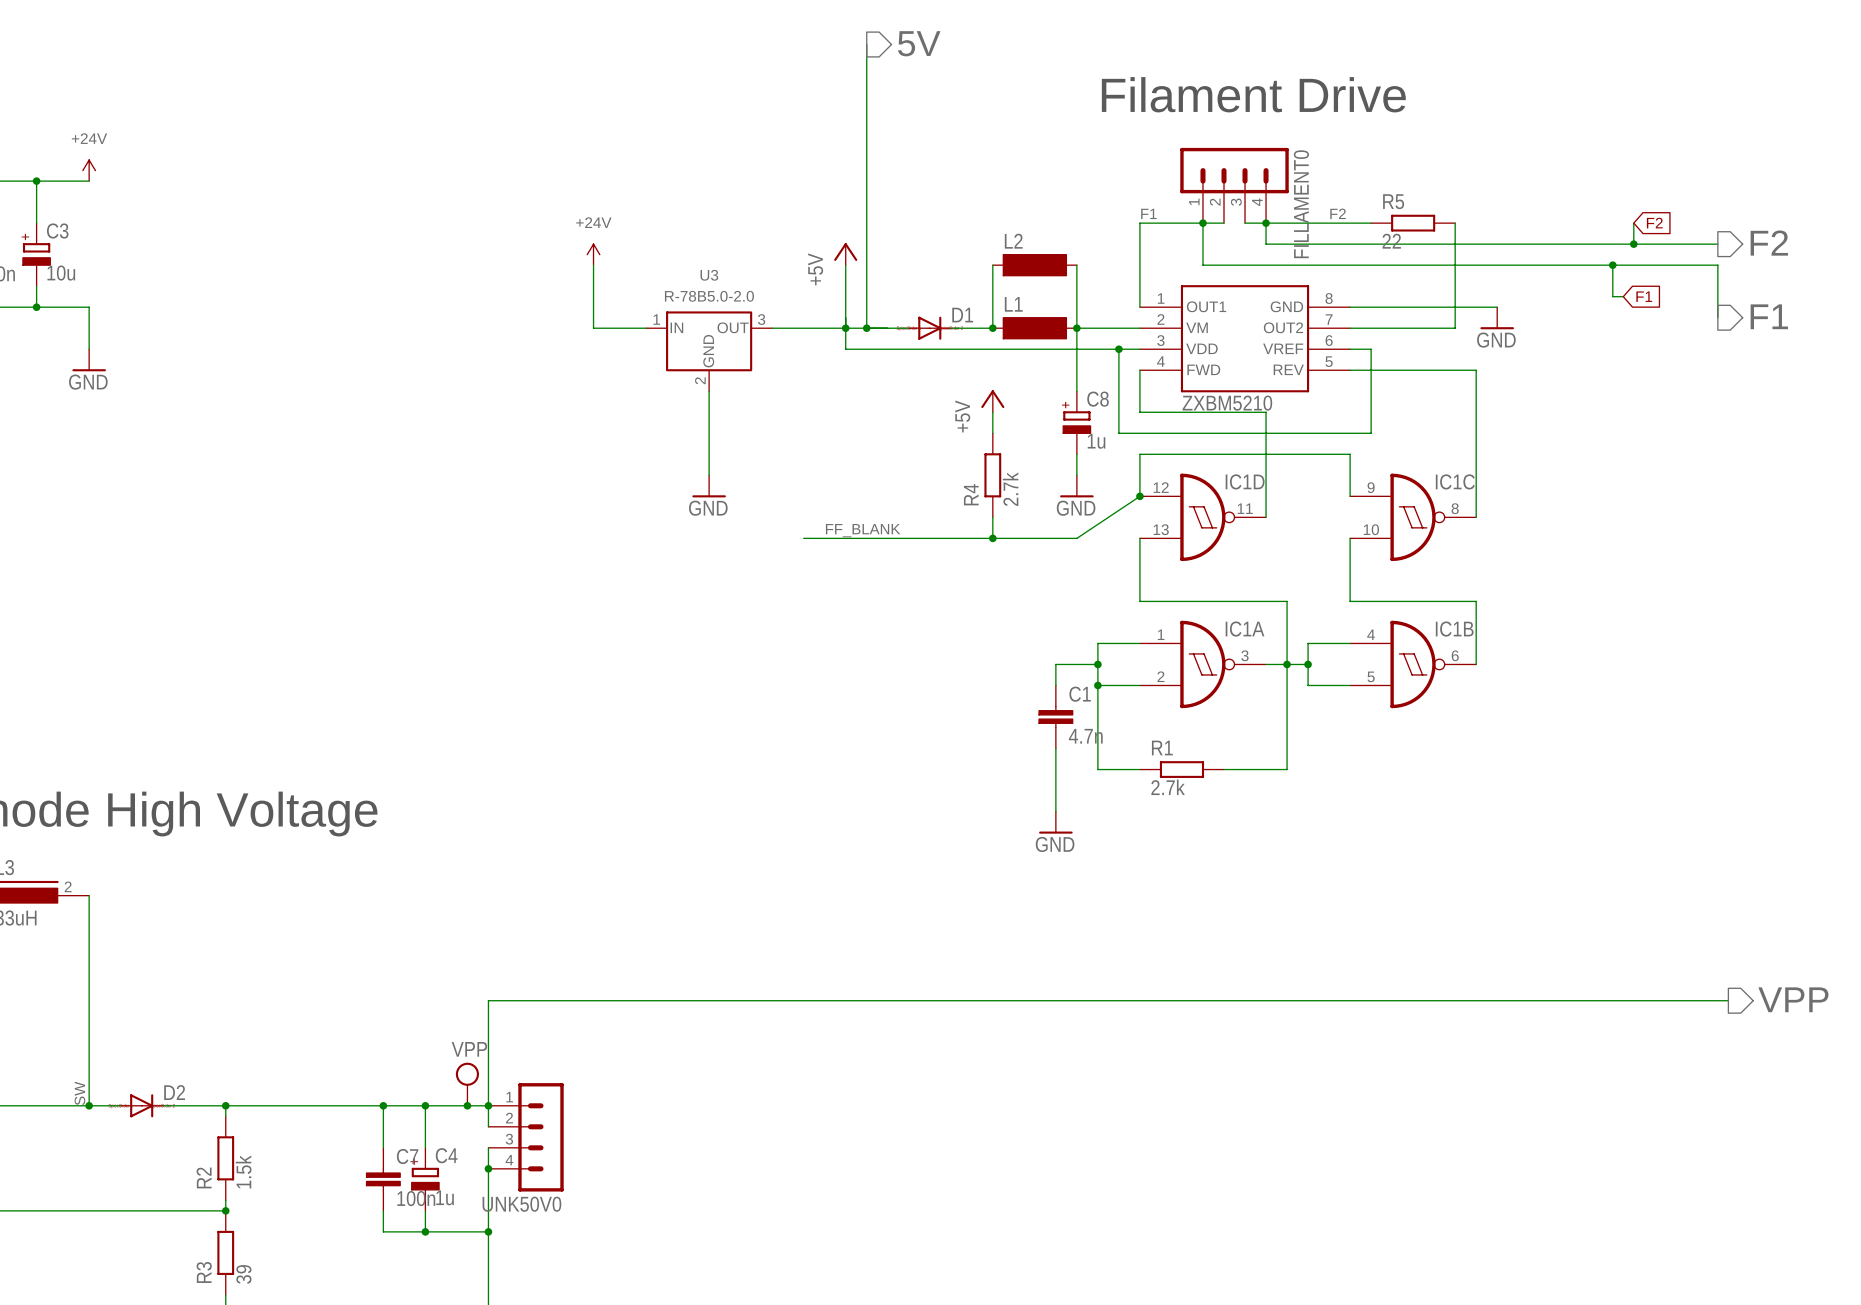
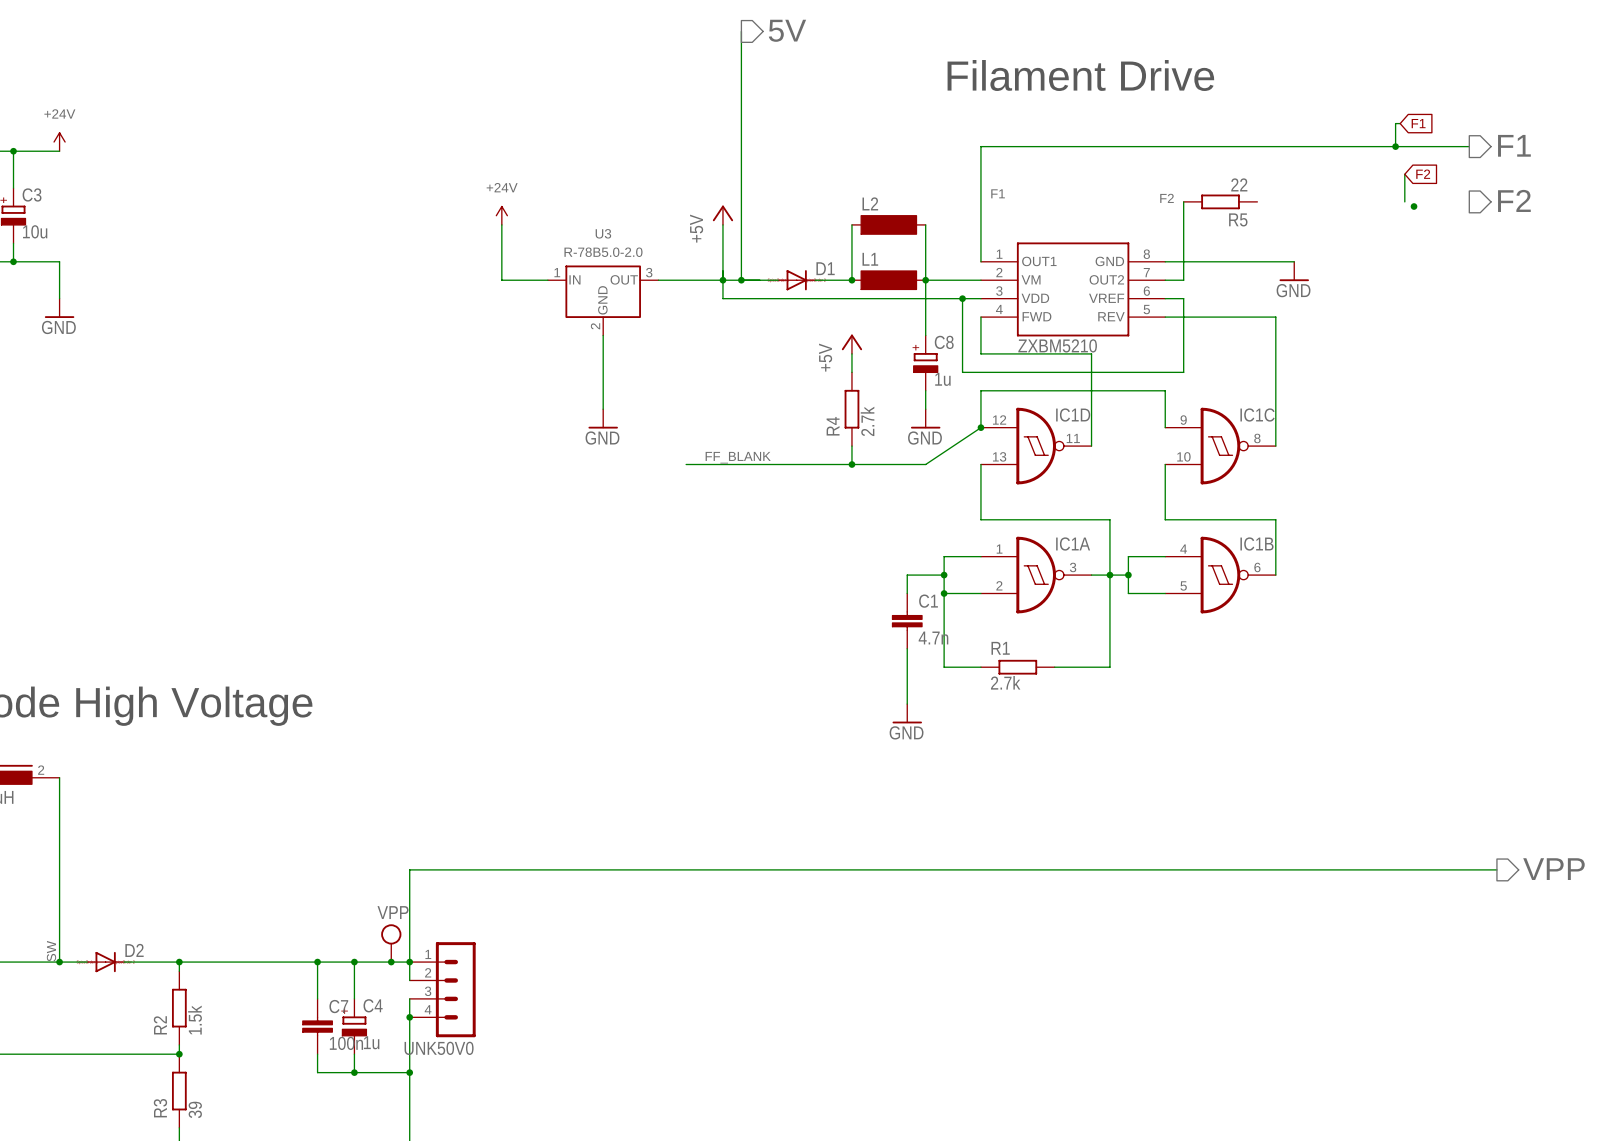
wire: none -> (1400, 123) (1395, 123) (1395, 146)
junction: none -> (1395, 146)
FILLAMENT0: (1234, 185) -> none
R5 name position: R5 (1393, 201) -> R5 (1238, 219)
wire: none -> (1404, 174) (1404, 201)
label position: F1 (1148, 213) -> F1 (998, 193)
label position: F2 (1338, 213) -> F2 (1167, 198)
wire: (1139, 223) (1224, 223) -> (980, 188) (980, 146) (1469, 146)
wire: (1202, 223) (1202, 265) (1717, 265) (1717, 317) -> none
junction: (1202, 223) -> none
wire: (1245, 223) (1371, 223) -> none
wire: (1266, 223) (1266, 244) (1717, 244) -> none
junction: (1266, 223) -> none
R5 position: (1413, 223) -> (1220, 201)
wire: (1455, 223) (1455, 328) (1371, 328) -> (1183, 201) (1183, 280)
wire: (1633, 223) (1633, 244) -> none
global label position: F2 (1654, 223) -> F2 (1423, 174)
R5 value position: 22 (1391, 241) -> 22 (1239, 184)
hierarchical label position: F2 (1769, 243) -> F2 (1514, 200)
wire: (1612, 265) (1612, 296) (1623, 296) -> none
junction: (1612, 265) -> none
global label position: F1 (1644, 296) -> F1 (1418, 123)
hierarchical label position: F1 (1769, 316) -> F1 (1514, 145)

